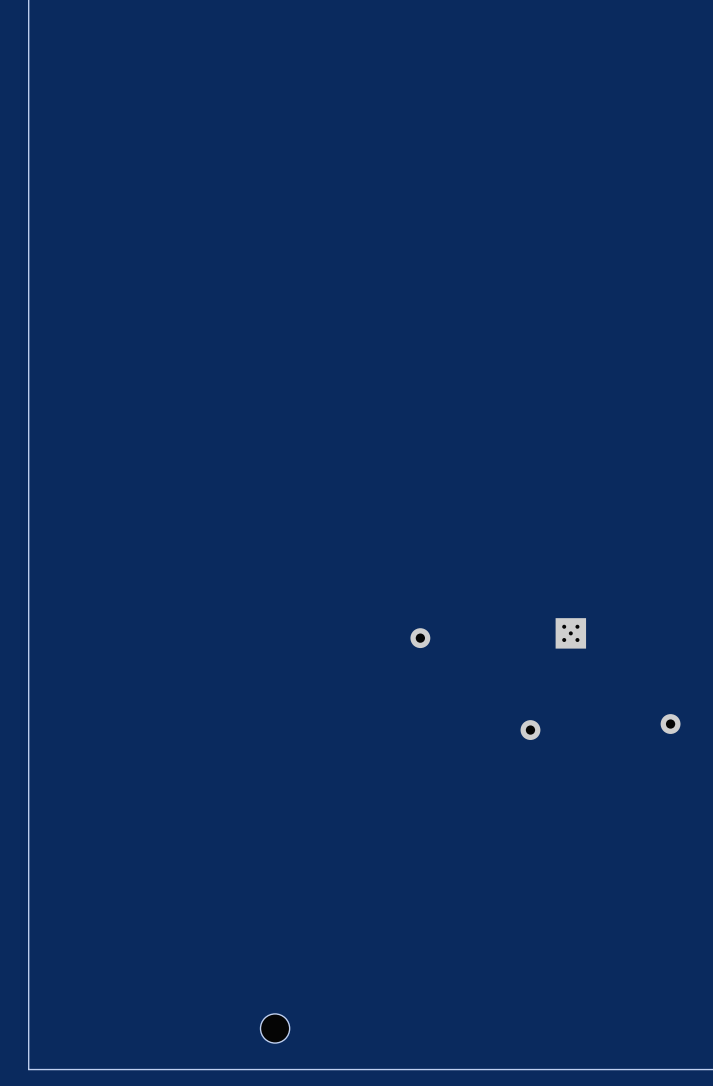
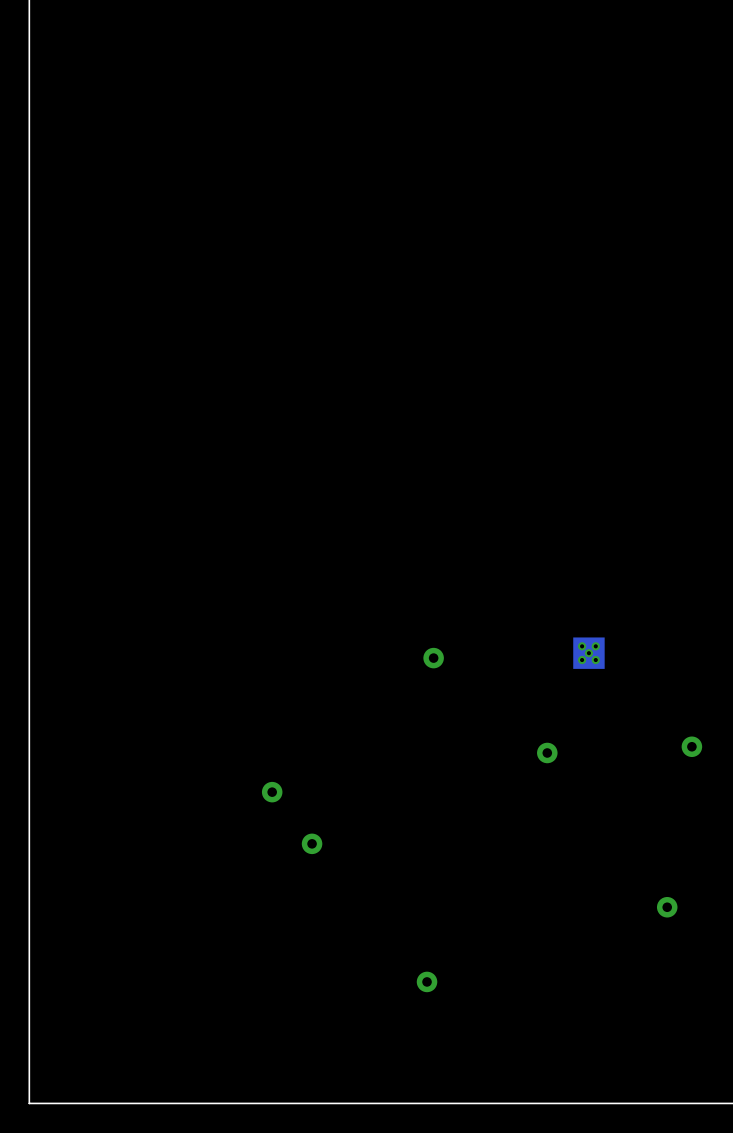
part: none -> (272, 792)
part: none -> (312, 843)
part: none -> (667, 907)
part: none -> (427, 981)
part: (275, 1028) -> none

